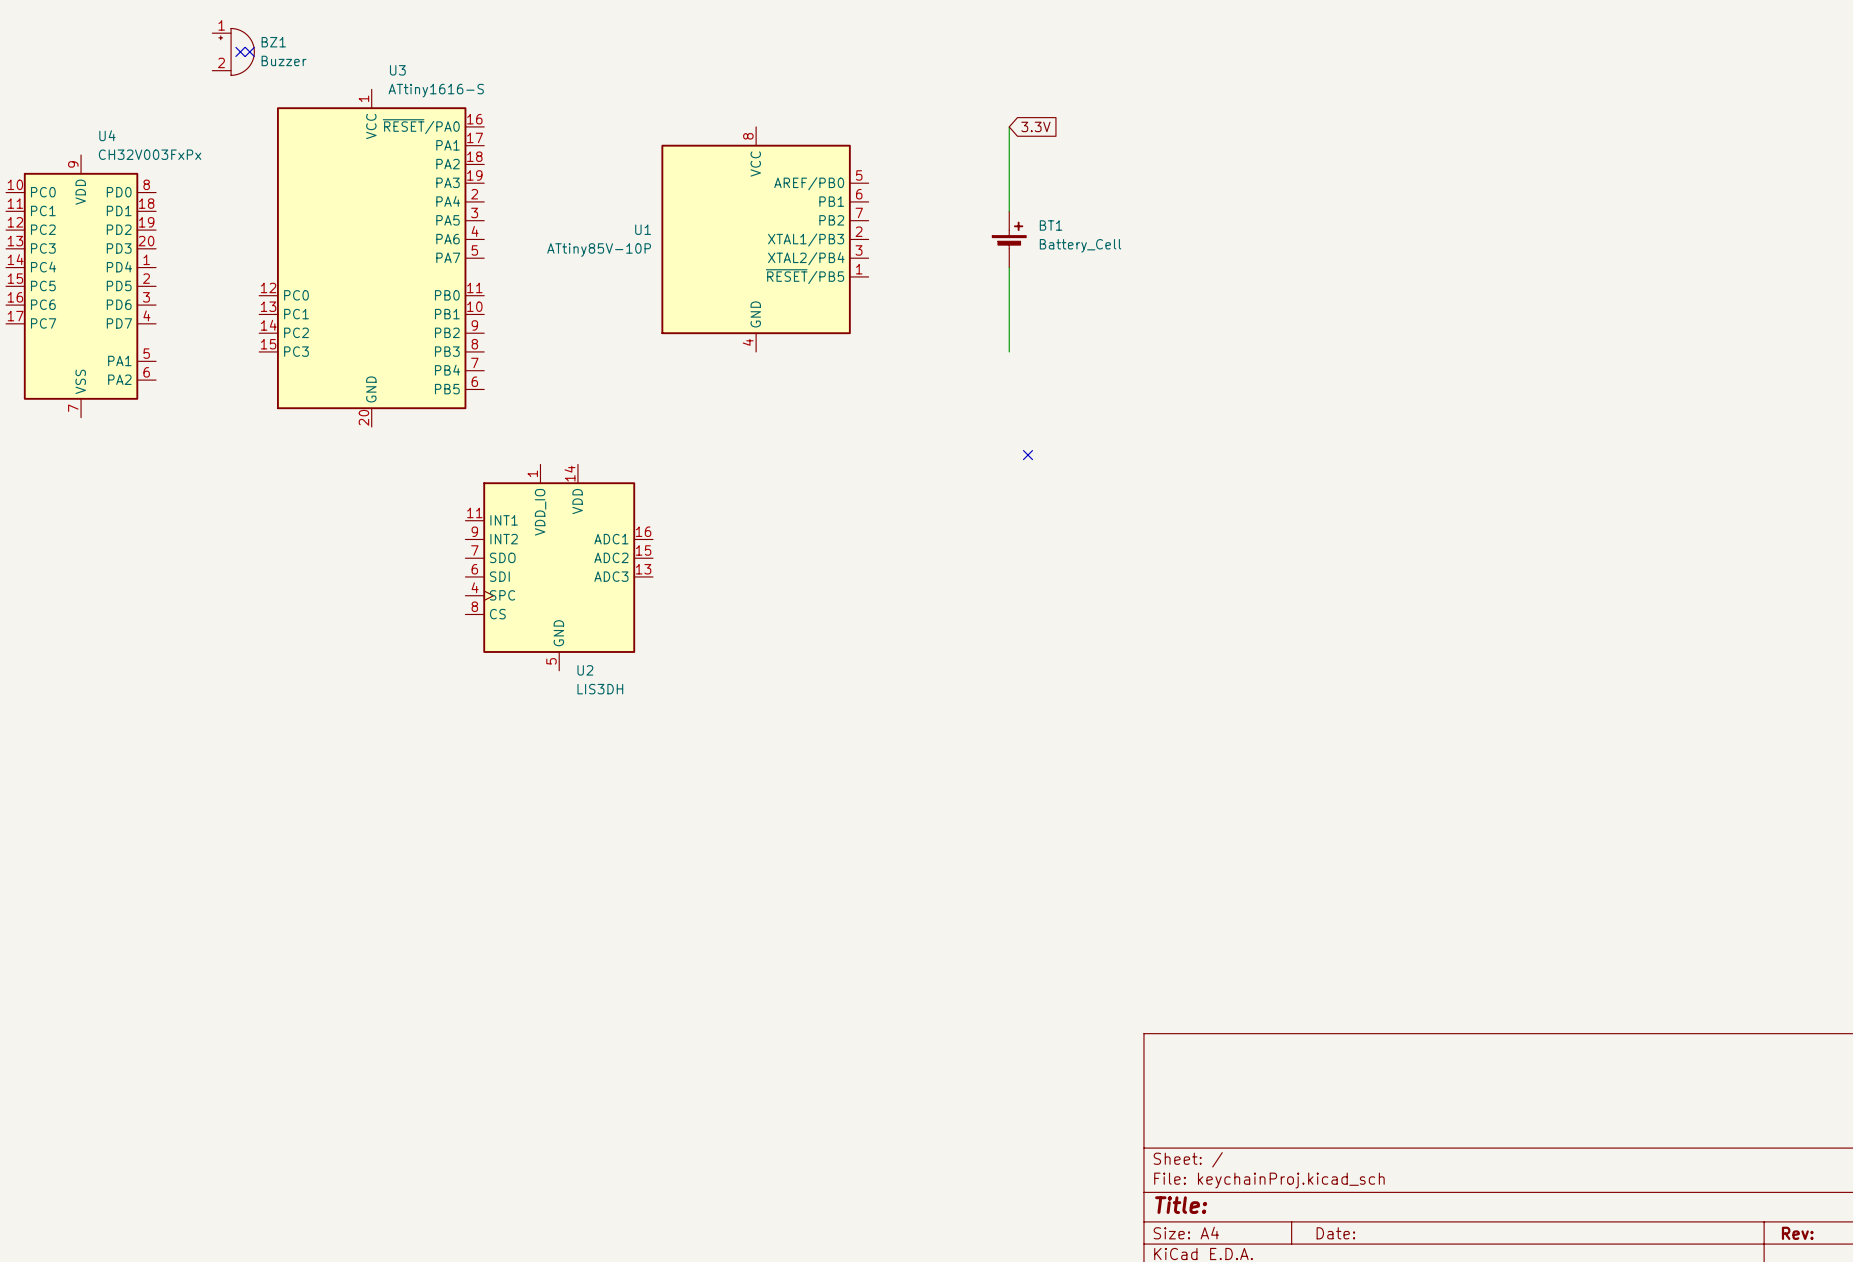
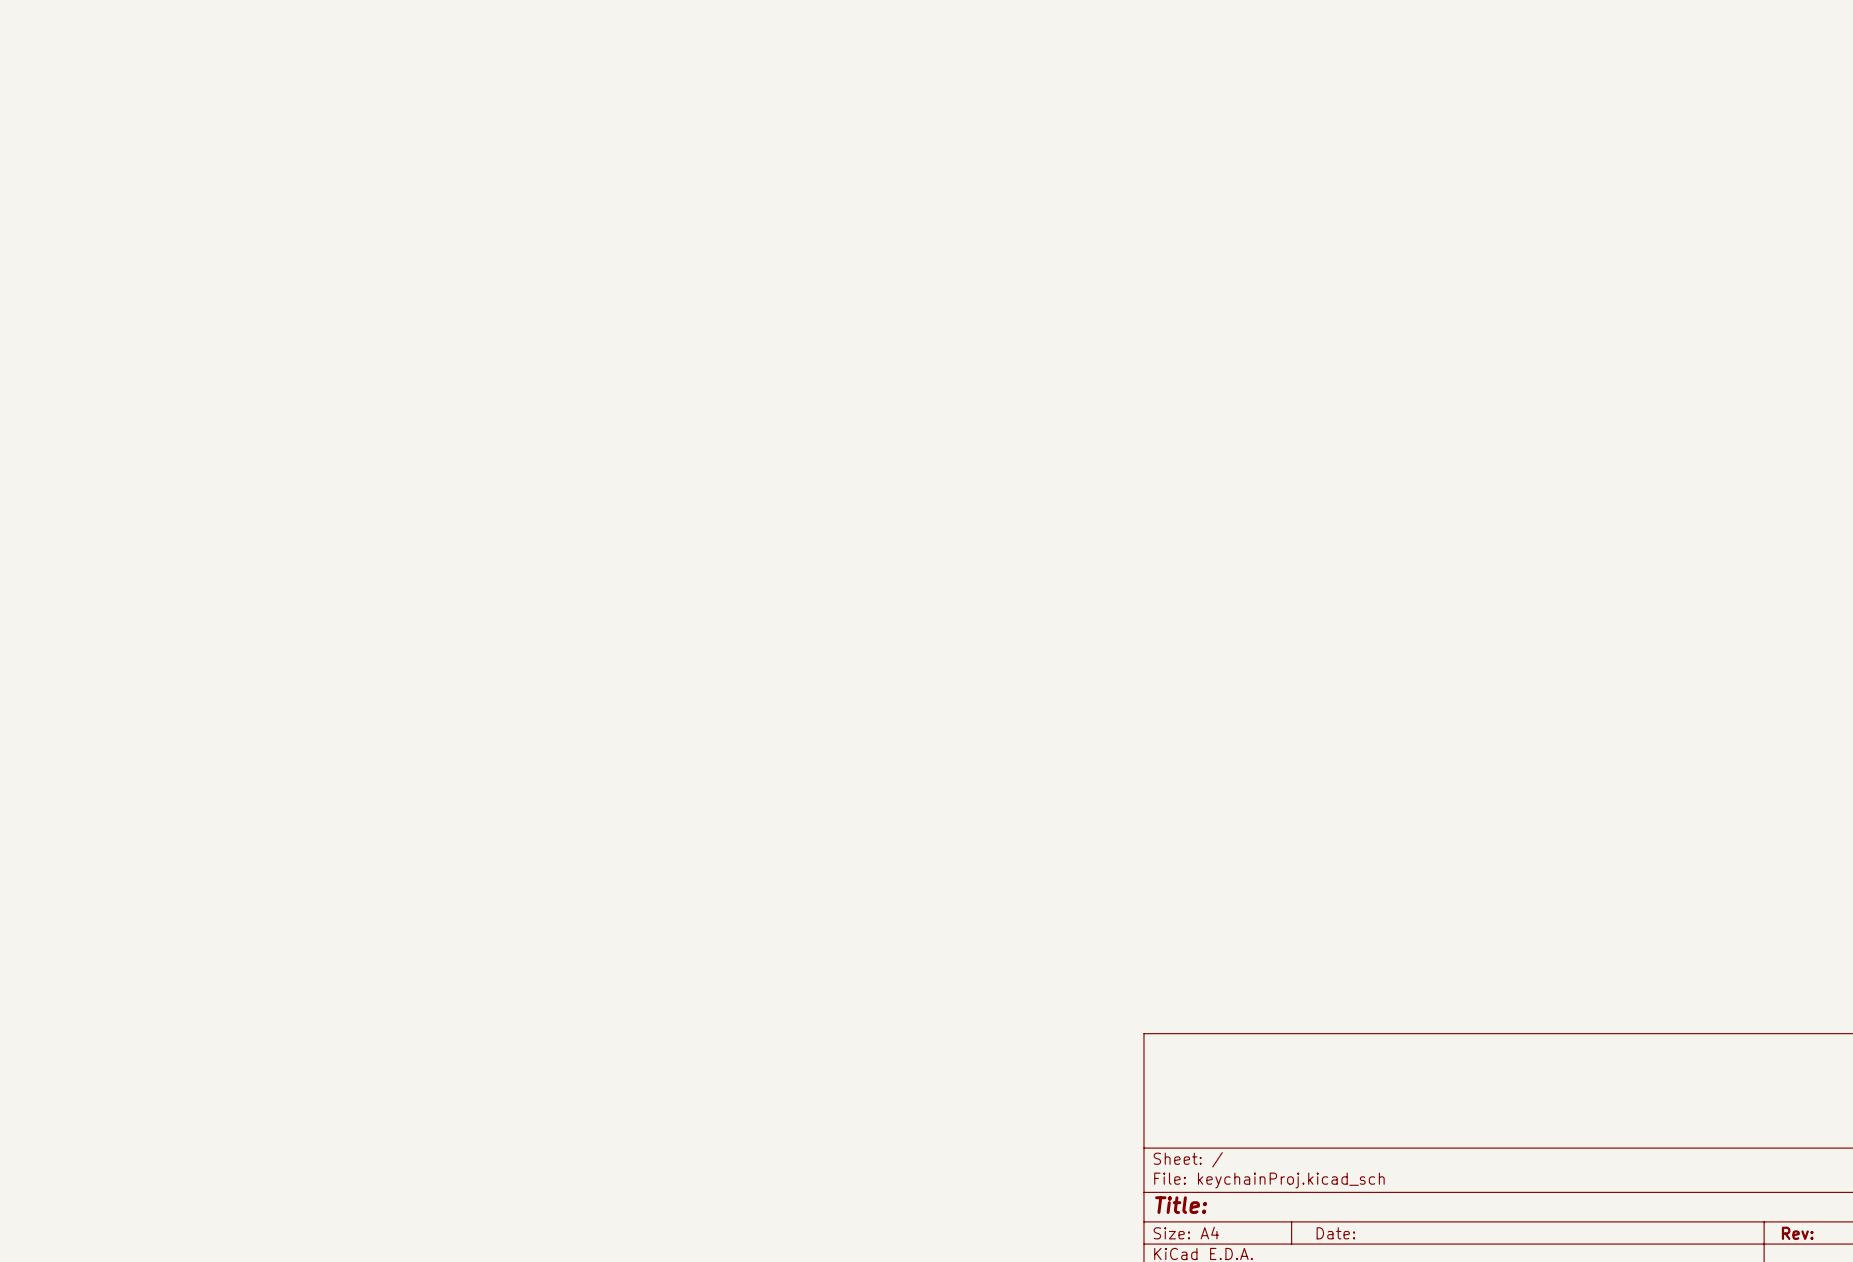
BZ1: Buzzer (233, 51) -> none
no-connect mark: (240, 51) -> none
no-connect mark: (249, 51) -> none
wire: (1009, 126) (1009, 211) -> none
global label: 3.3V (1035, 126) -> none
U1: ATtiny85V-10P (765, 239) -> none
BT1: Battery_Cell (1009, 239) -> none
U3: ATtiny1616-S (371, 258) -> none
wire: (1009, 267) (1009, 351) -> none
U4: CH32V003FxPx (81, 286) -> none
no-connect mark: (1028, 455) -> none
U2: LIS3DH (559, 567) -> none

